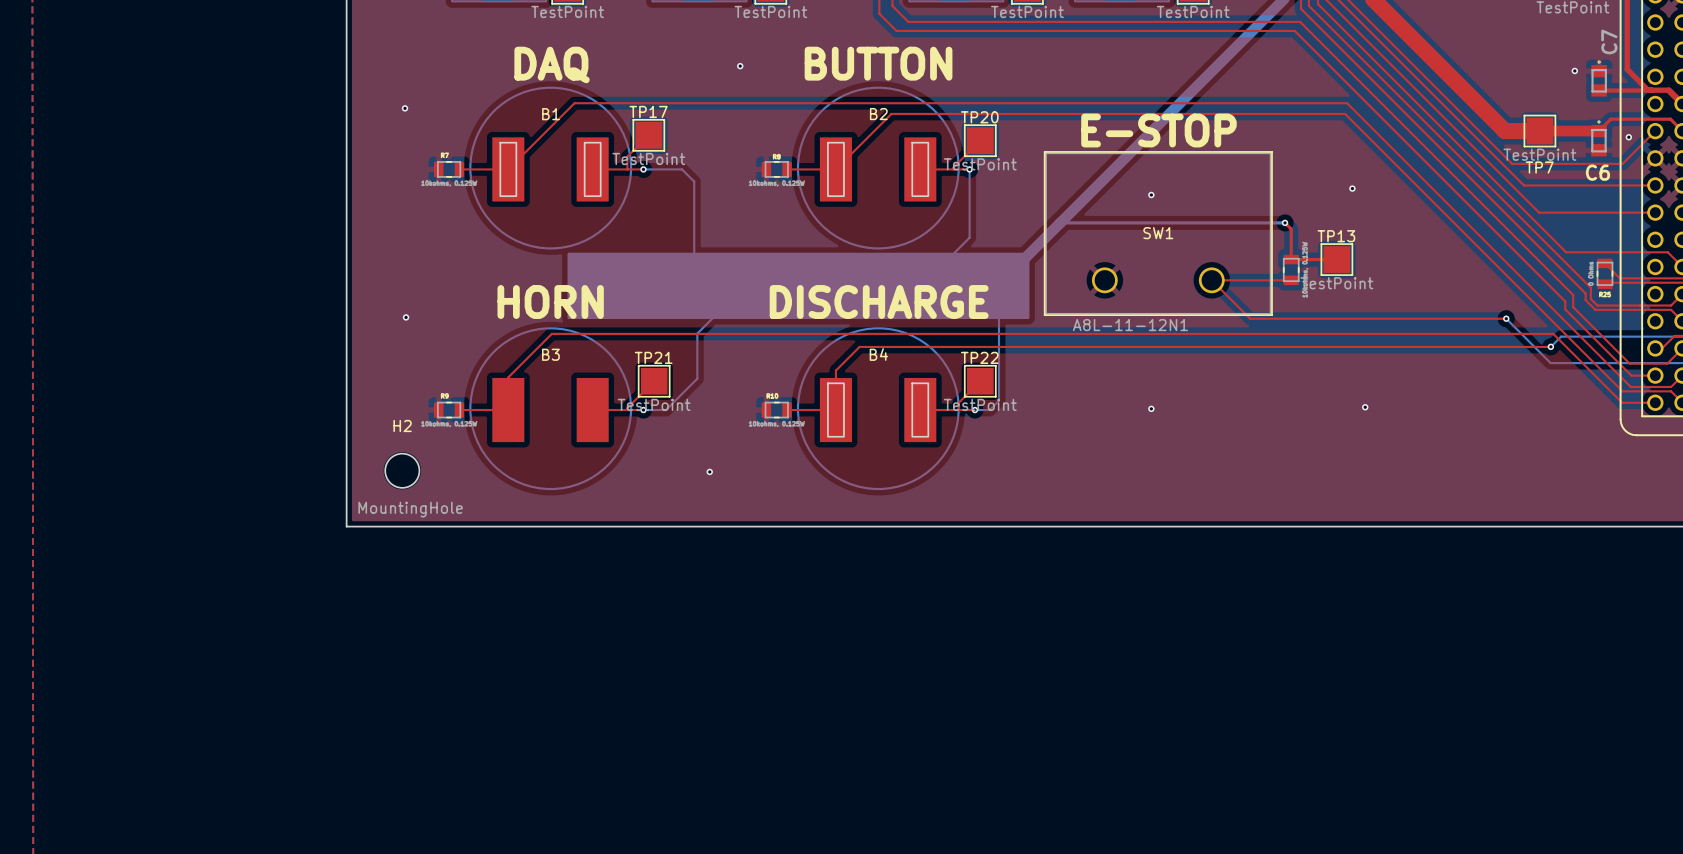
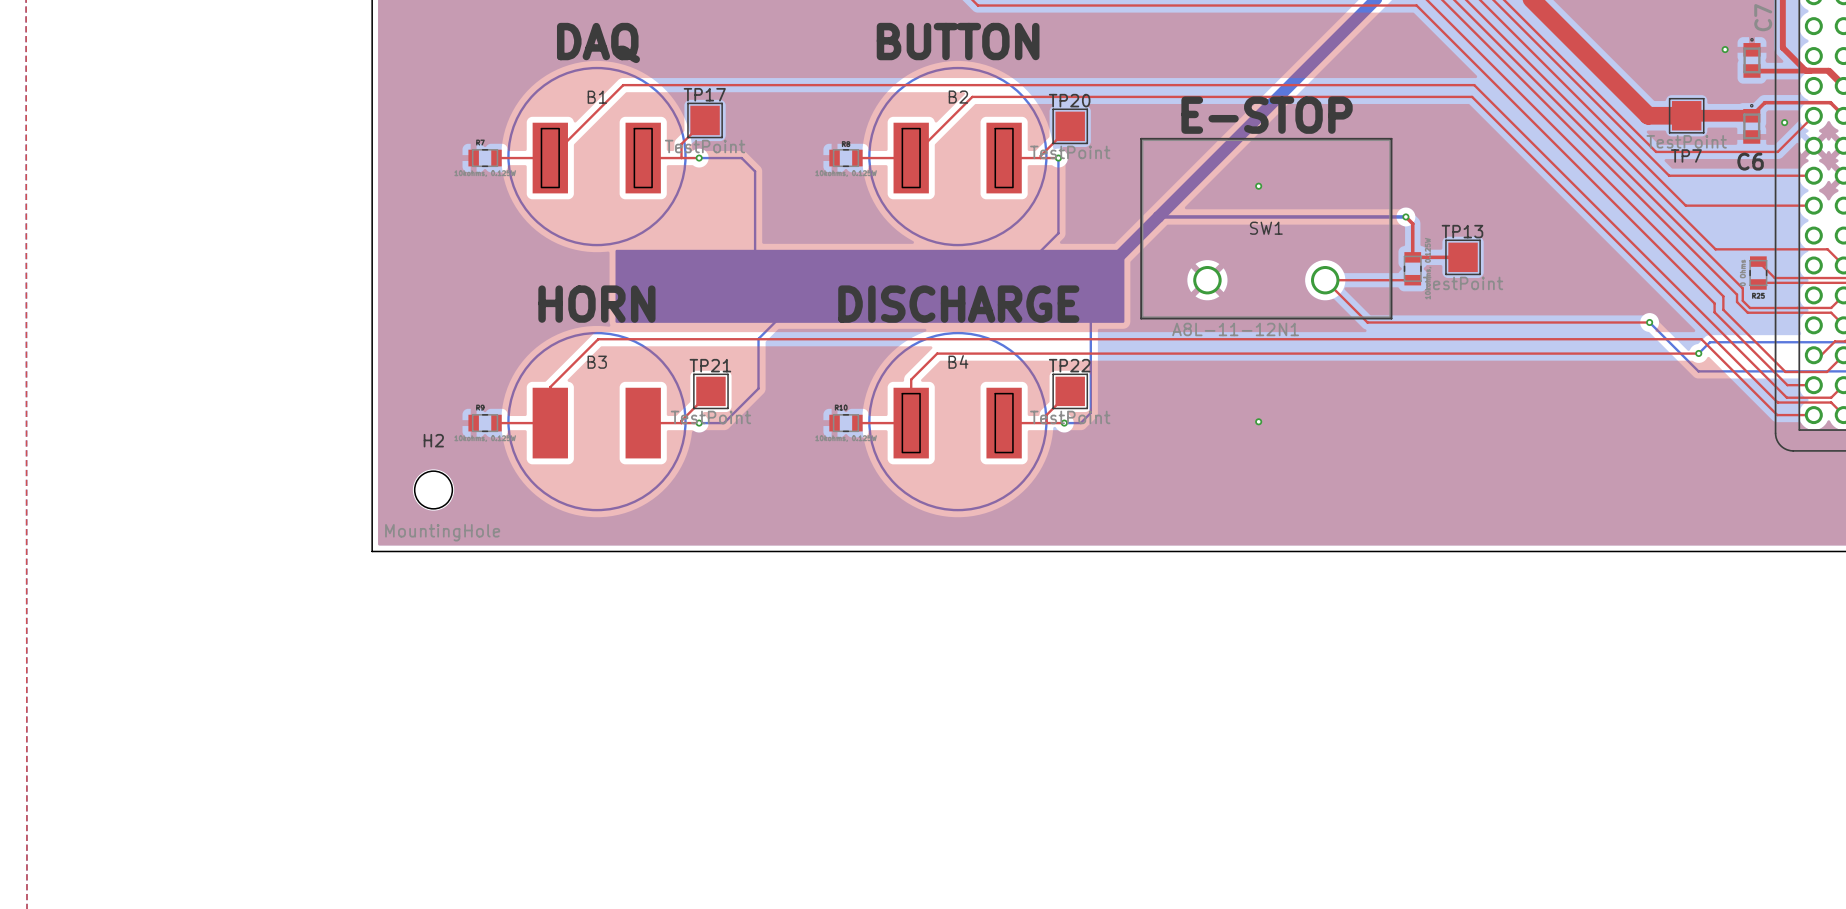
via: (740, 66) -> none
via: (404, 108) -> none
via: (1352, 188) -> none
via: (406, 317) -> none
via: (1365, 407) -> none
via: (709, 471) -> none

